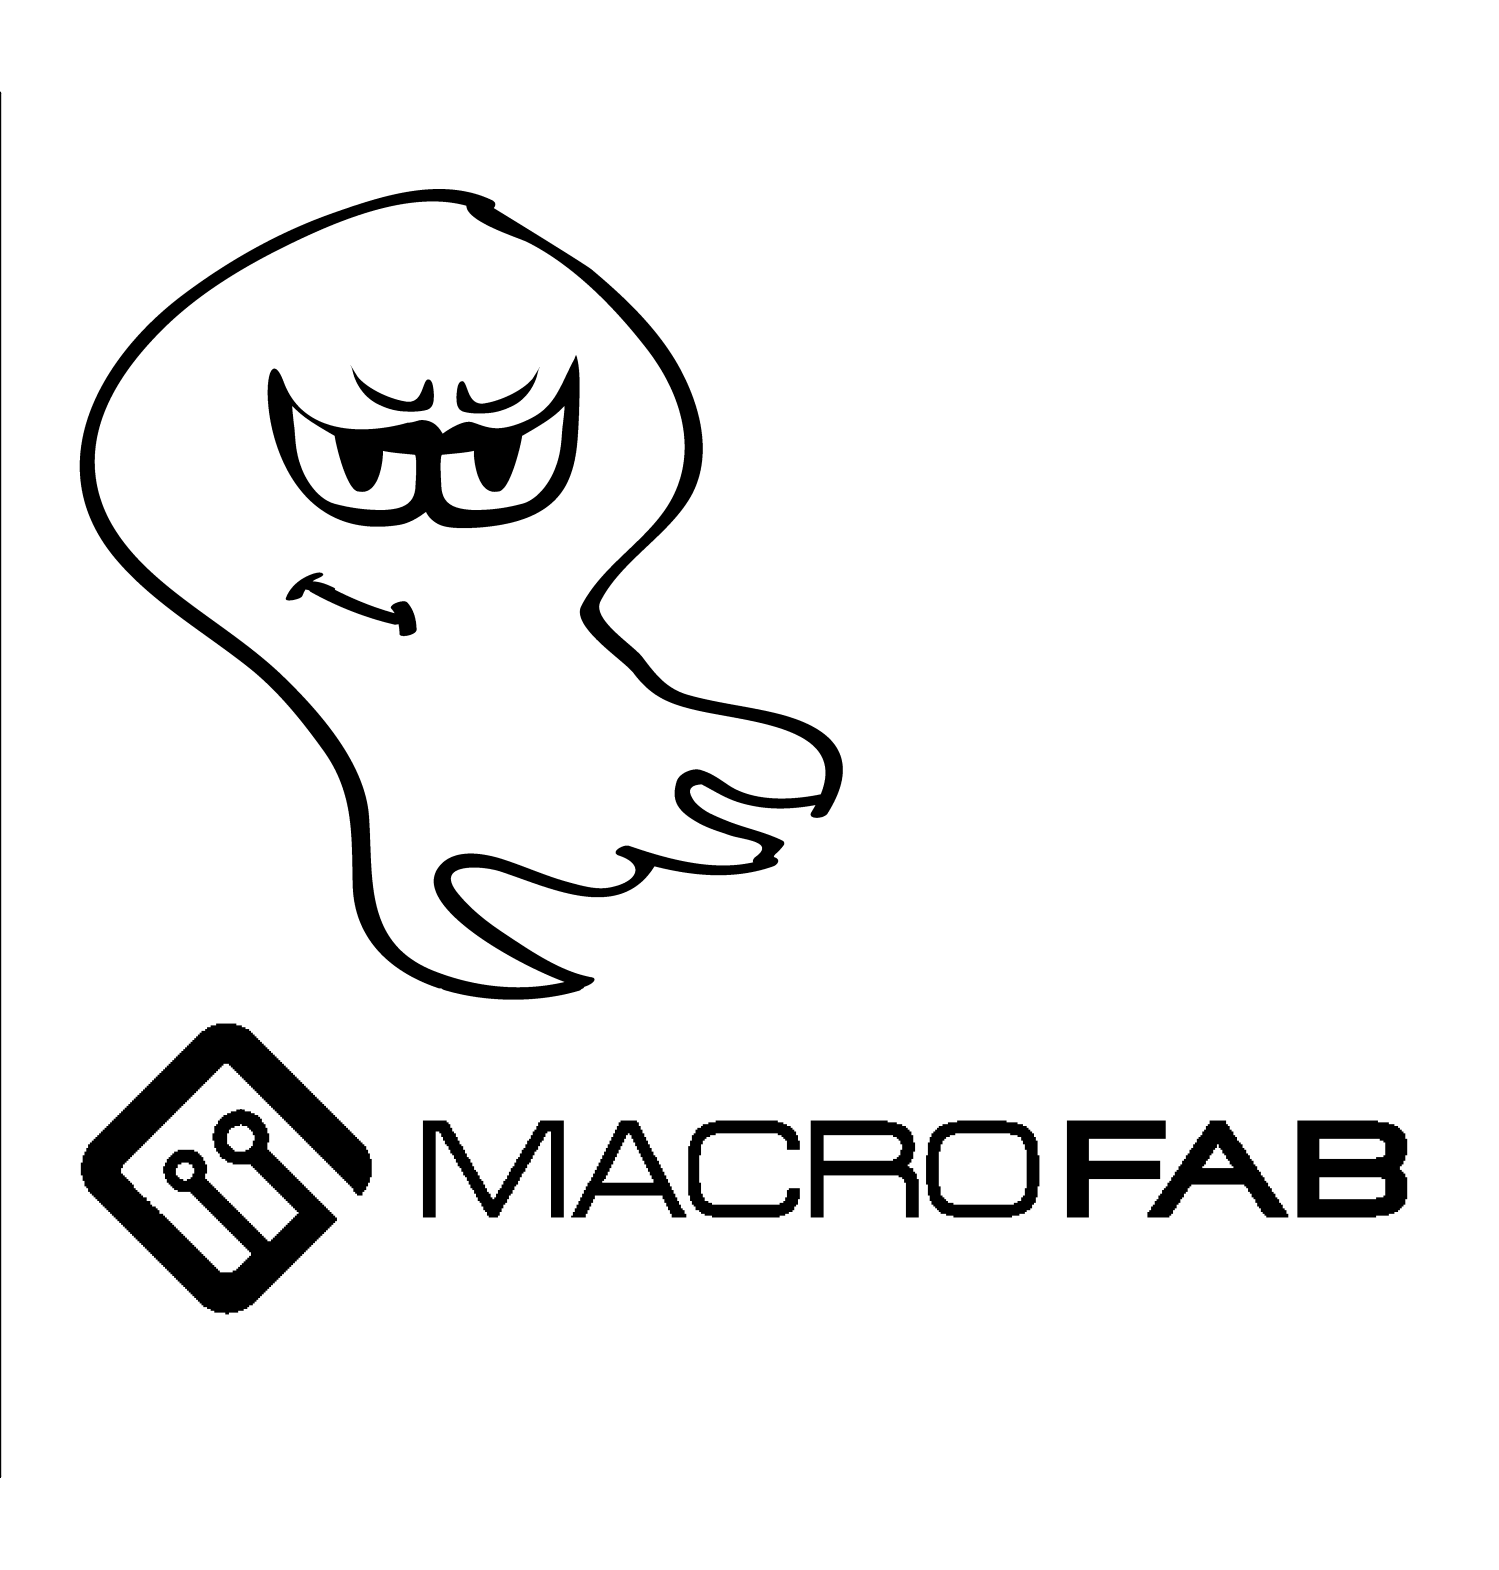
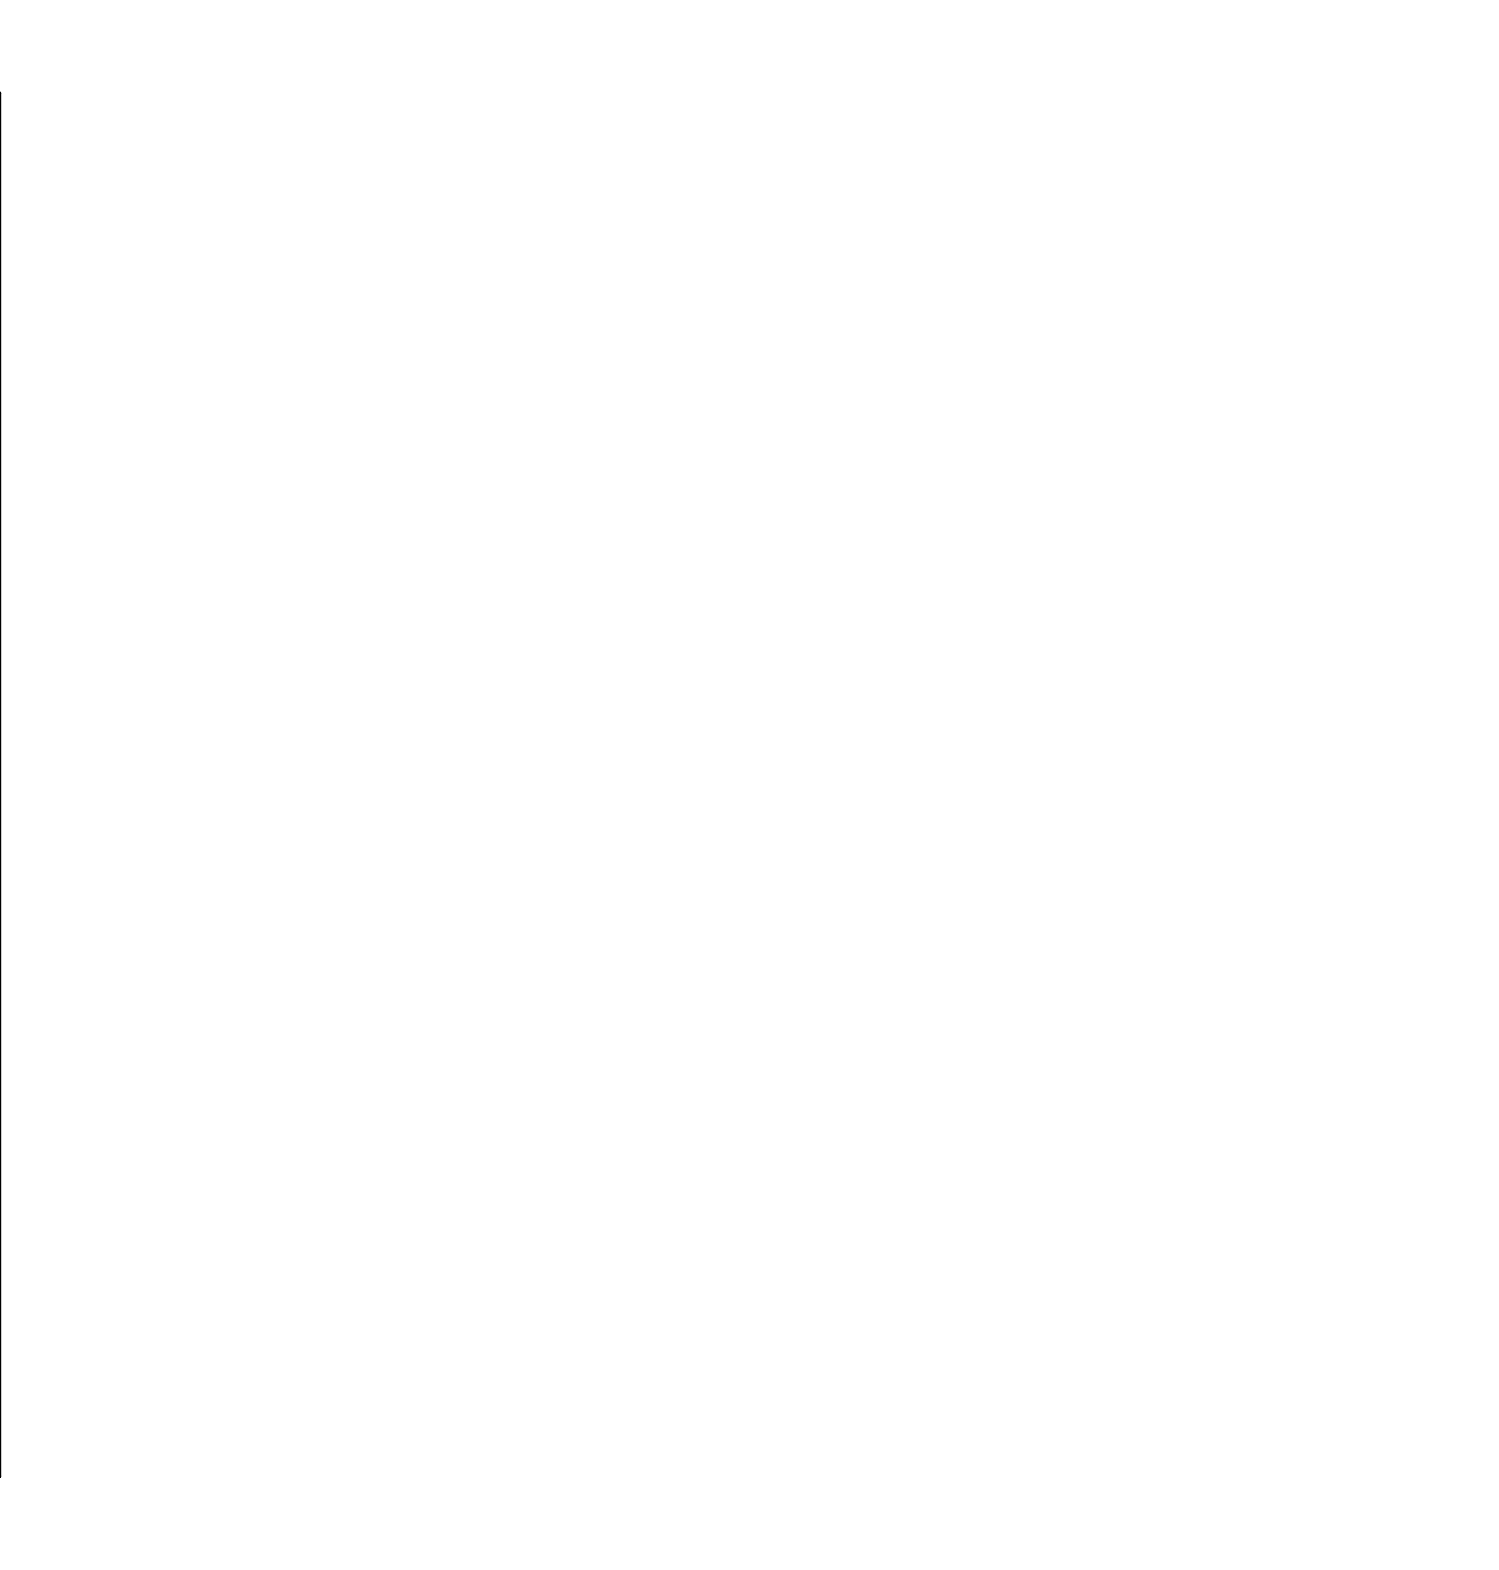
drawing: [79, 189, 1408, 1315] -> none

